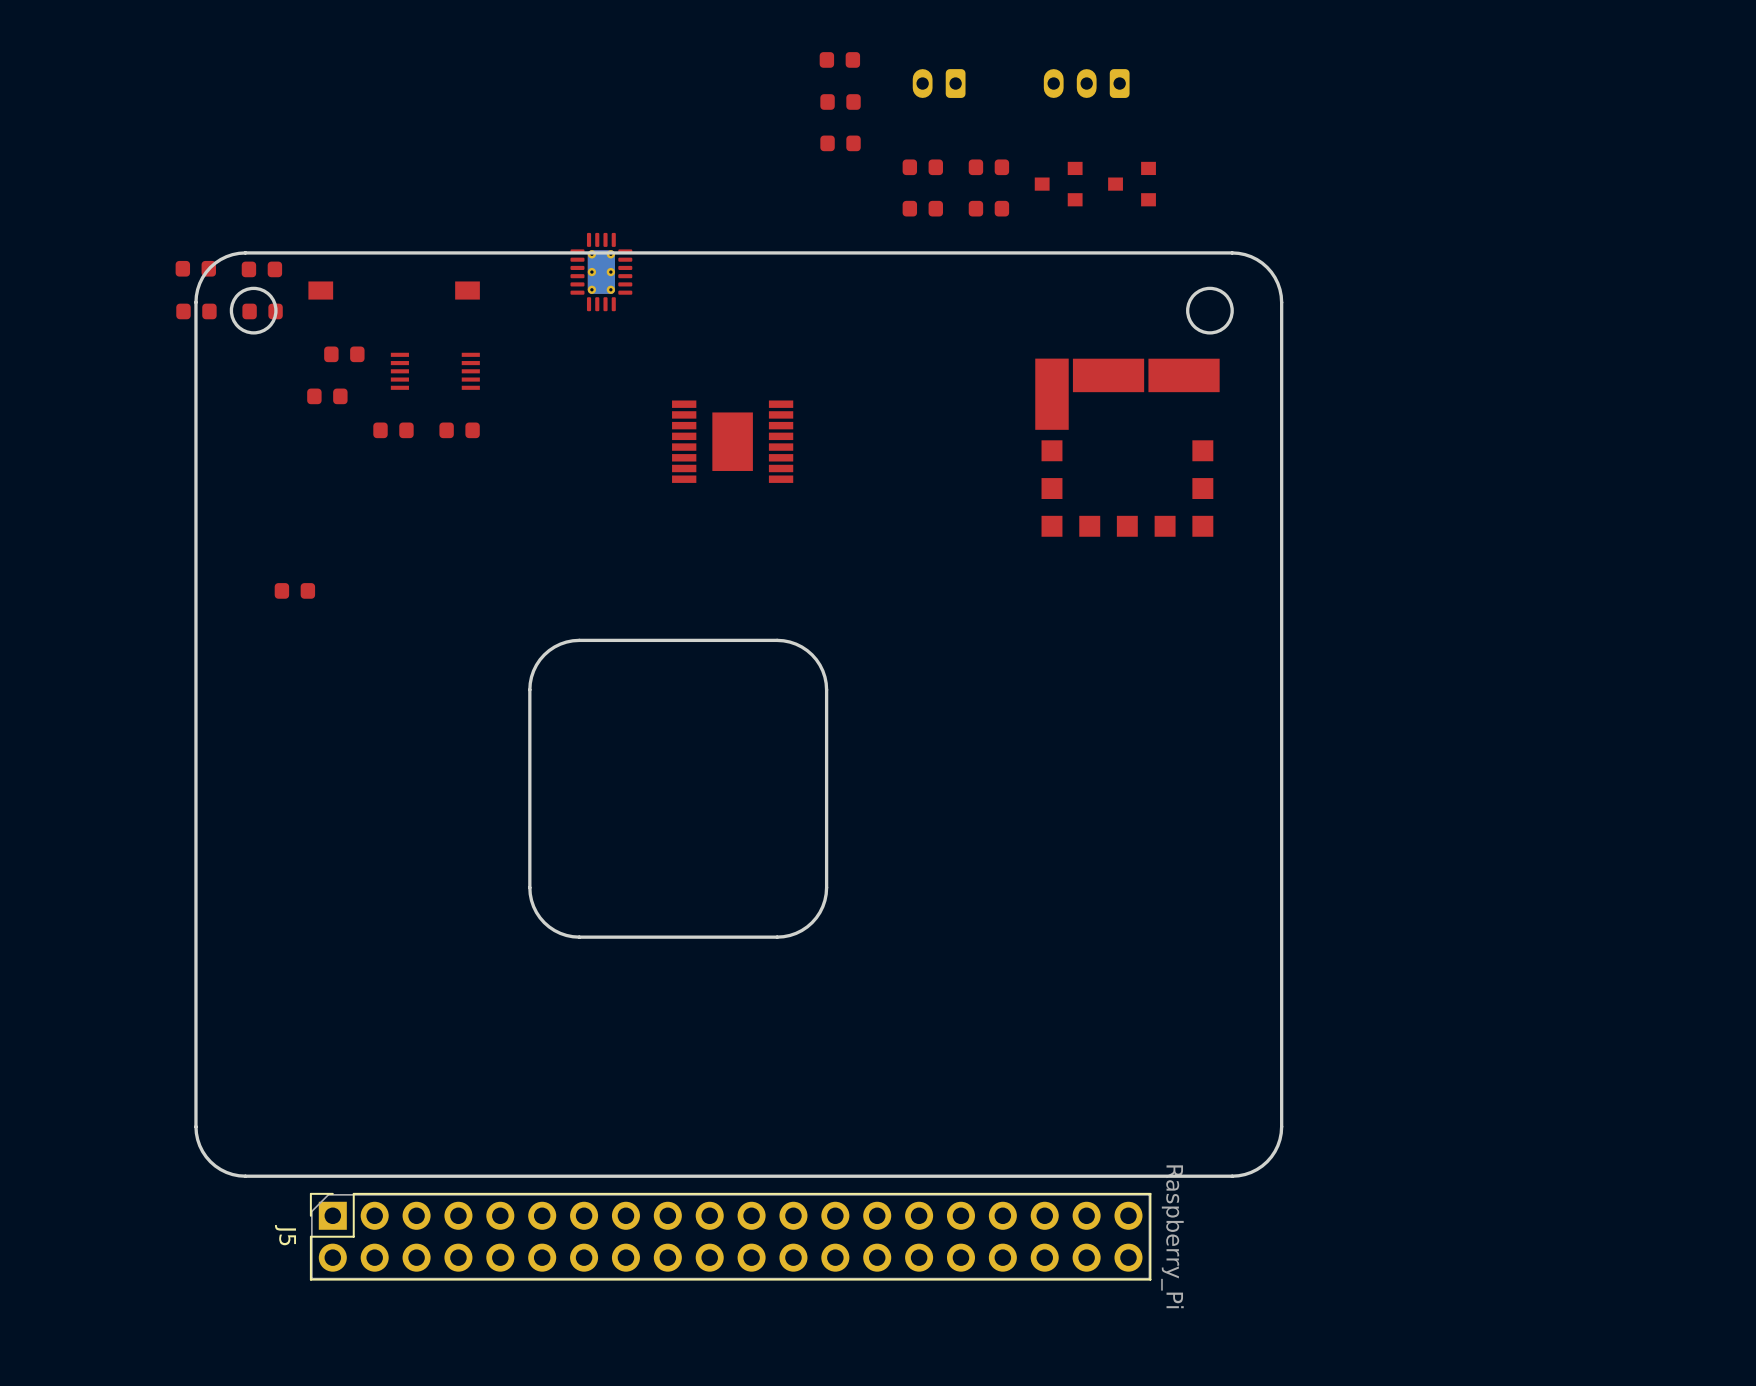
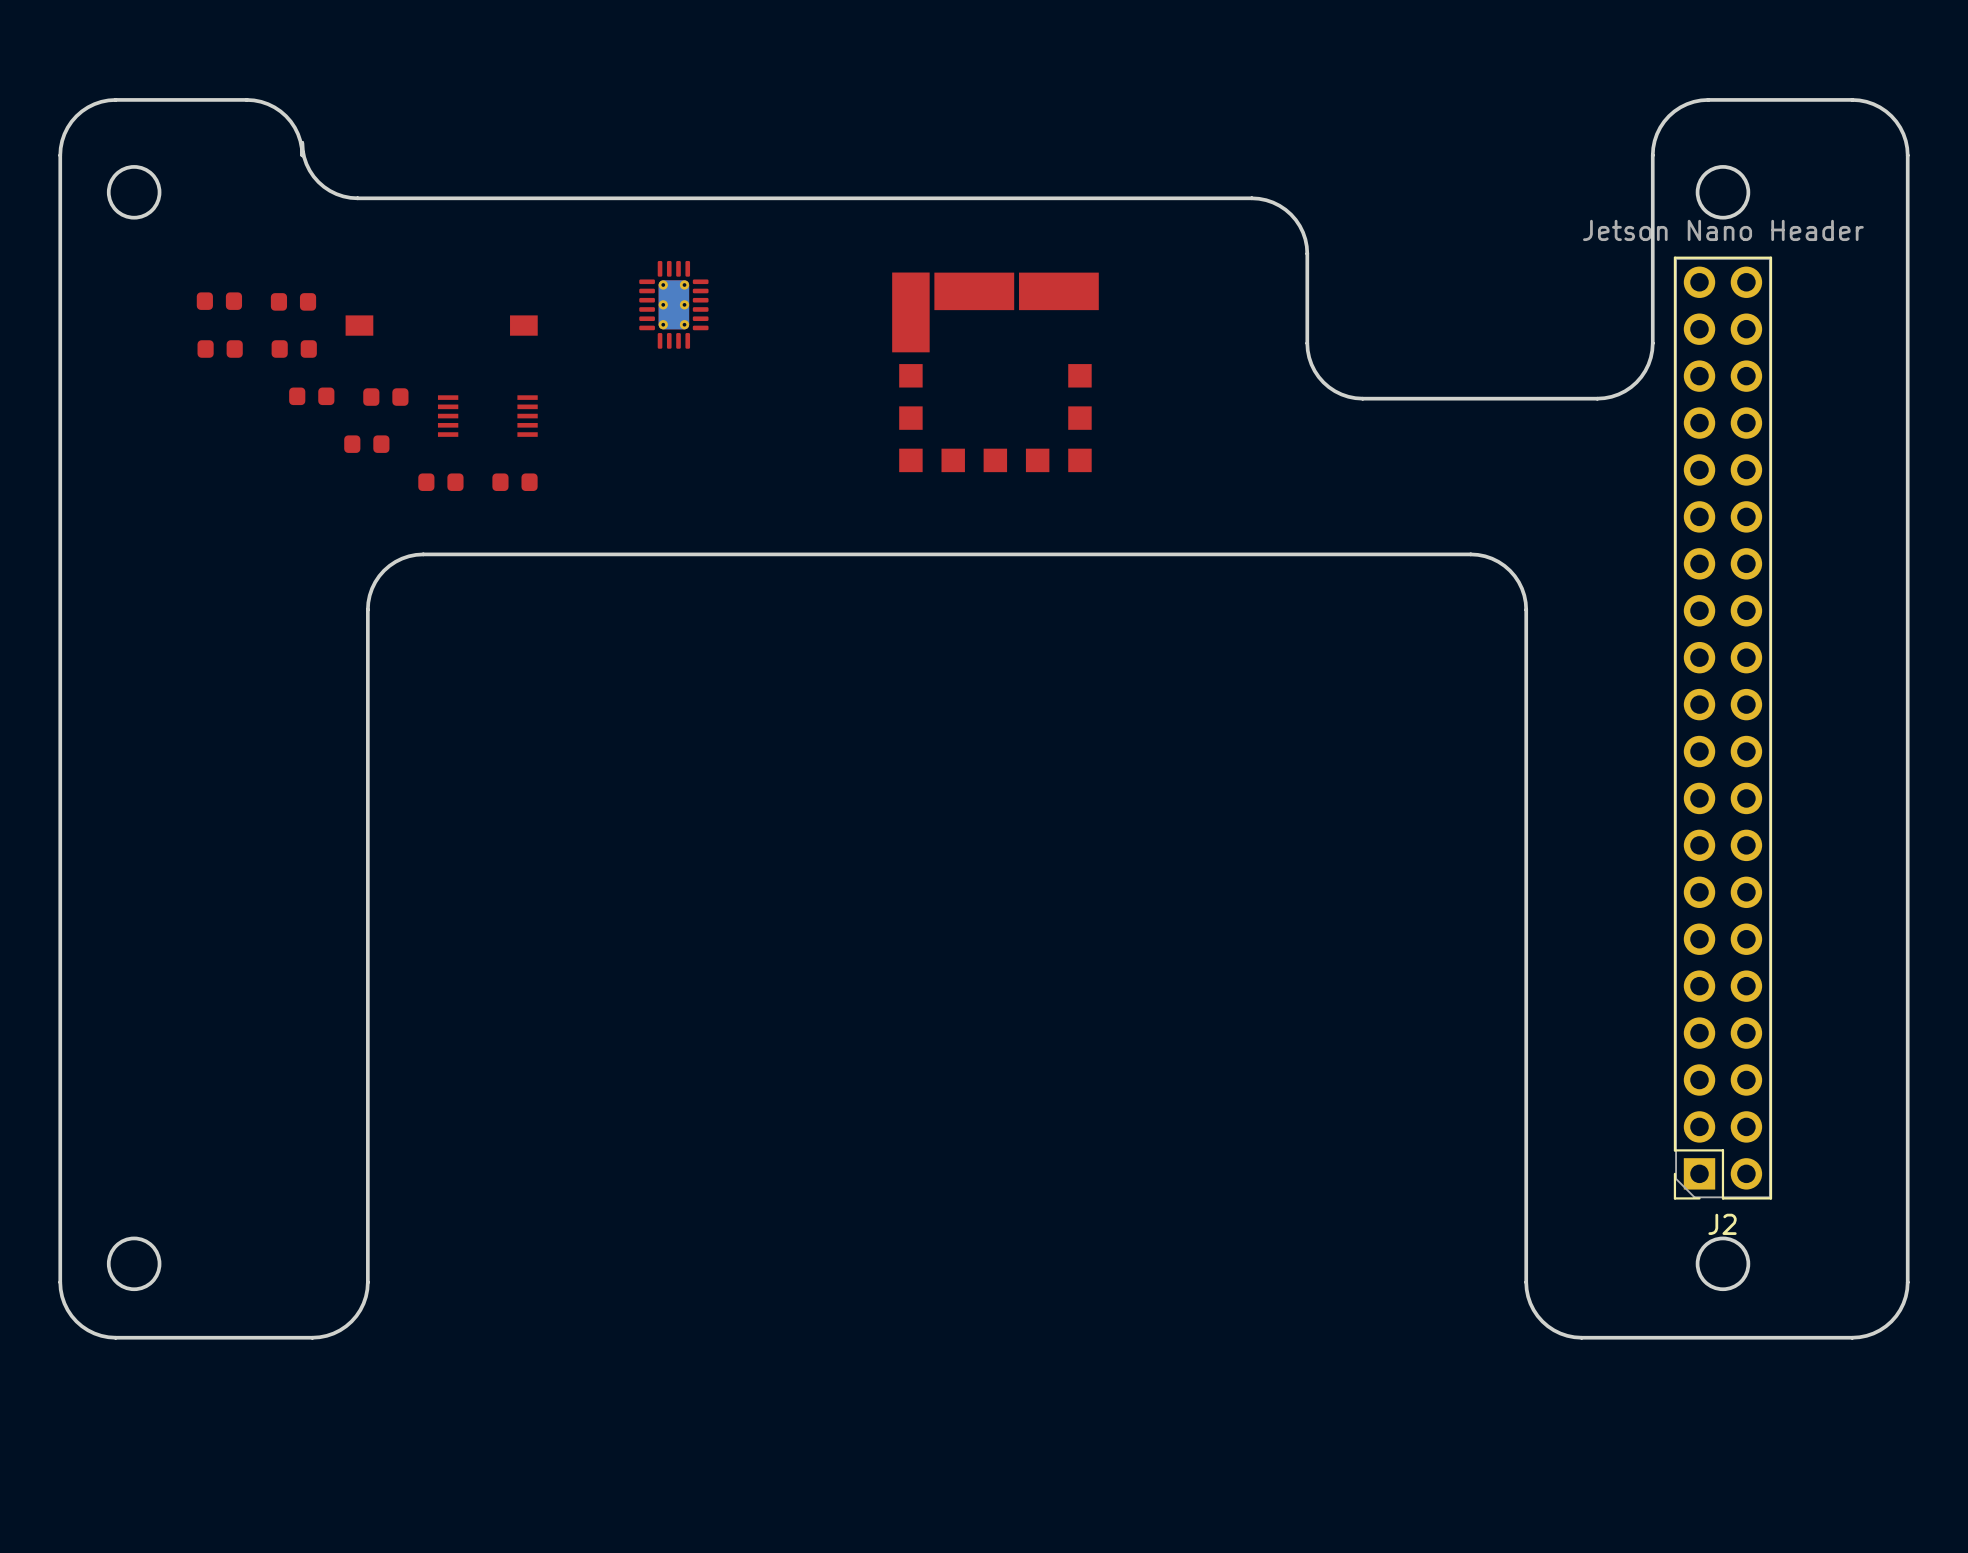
part: (839, 59) -> none
part: (939, 83) -> none
part: (1086, 83) -> none
part: (840, 101) -> none
part: (840, 143) -> none
round board edge: none -> [106, 165, 162, 220]
round board edge: none -> [1695, 165, 1751, 220]
part: (922, 167) -> none
part: (988, 167) -> none
part: (1058, 184) -> none
part: (1132, 184) -> none
part: (922, 208) -> none
part: (988, 208) -> none
board edge: (1232, 252) (245, 252) (226, 256) (210, 267) (199, 283) (195, 302) (195, 1126) (199, 1145) (210, 1161) (226, 1172) (245, 1176) (1232, 1176) (1251, 1172) (1267, 1161) (1277, 1145) (1281, 1126) (1281, 302) (1277, 283) (1267, 267) (1251, 256) (1232, 252) -> (1852, 99) (1873, 104) (1891, 116) (1903, 134) (1907, 155) (1907, 1282) (1903, 1303) (1896, 1316) (1886, 1326) (1873, 1333) (1852, 1337) (1581, 1337) (1567, 1335) (1553, 1330) (1542, 1321) (1533, 1310) (1528, 1296) (1526, 1282) (1525, 602) (1518, 582) (1509, 570) (1492, 558) (1470, 554) (423, 554) (408, 556) (395, 561) (384, 570) (375, 582) (369, 595) (367, 609) (367, 1282) (363, 1303) (356, 1316) (346, 1326) (333, 1333) (312, 1337) (108, 1337) (87, 1330) (71, 1316) (64, 1303) (60, 1282) (60, 155) (64, 134) (71, 121) (81, 111) (94, 104) (115, 99) (246, 99) (261, 101) (274, 107) (290, 121) (298, 134) (302, 155) (302, 142) (306, 164) (318, 182) (336, 194) (350, 197) (1259, 198) (1273, 202) (1285, 209) (1295, 219) (1303, 232) (1307, 253) (1307, 343) (1309, 357) (1318, 376) (1335, 391) (1348, 396) (1362, 398) (1597, 398) (1611, 396) (1631, 387) (1645, 370) (1650, 357) (1652, 343) (1652, 155) (1654, 141) (1664, 121) (1680, 107) (1700, 100) (1852, 99)
round board edge: [229, 286, 278, 335] -> none
round board edge: [1186, 286, 1234, 335] -> none
part: (732, 441) -> none
part position: (1127, 447) -> (995, 372)
part position: (294, 590) -> (311, 396)
board edge: (777, 640) (572, 640) (554, 647) (540, 659) (533, 670) (529, 689) (529, 887) (533, 906) (540, 917) (549, 926) (560, 933) (579, 937) (777, 937) (796, 933) (807, 926) (816, 917) (822, 906) (826, 887) (826, 683) (819, 665) (807, 650) (796, 644) (777, 640) -> none
J2: none -> Jetson Nano Header (1722, 728)
round board edge: none -> [106, 1236, 162, 1292]
round board edge: none -> [1695, 1236, 1751, 1292]
J5: Raspberry_Pi (730, 1236) -> none

